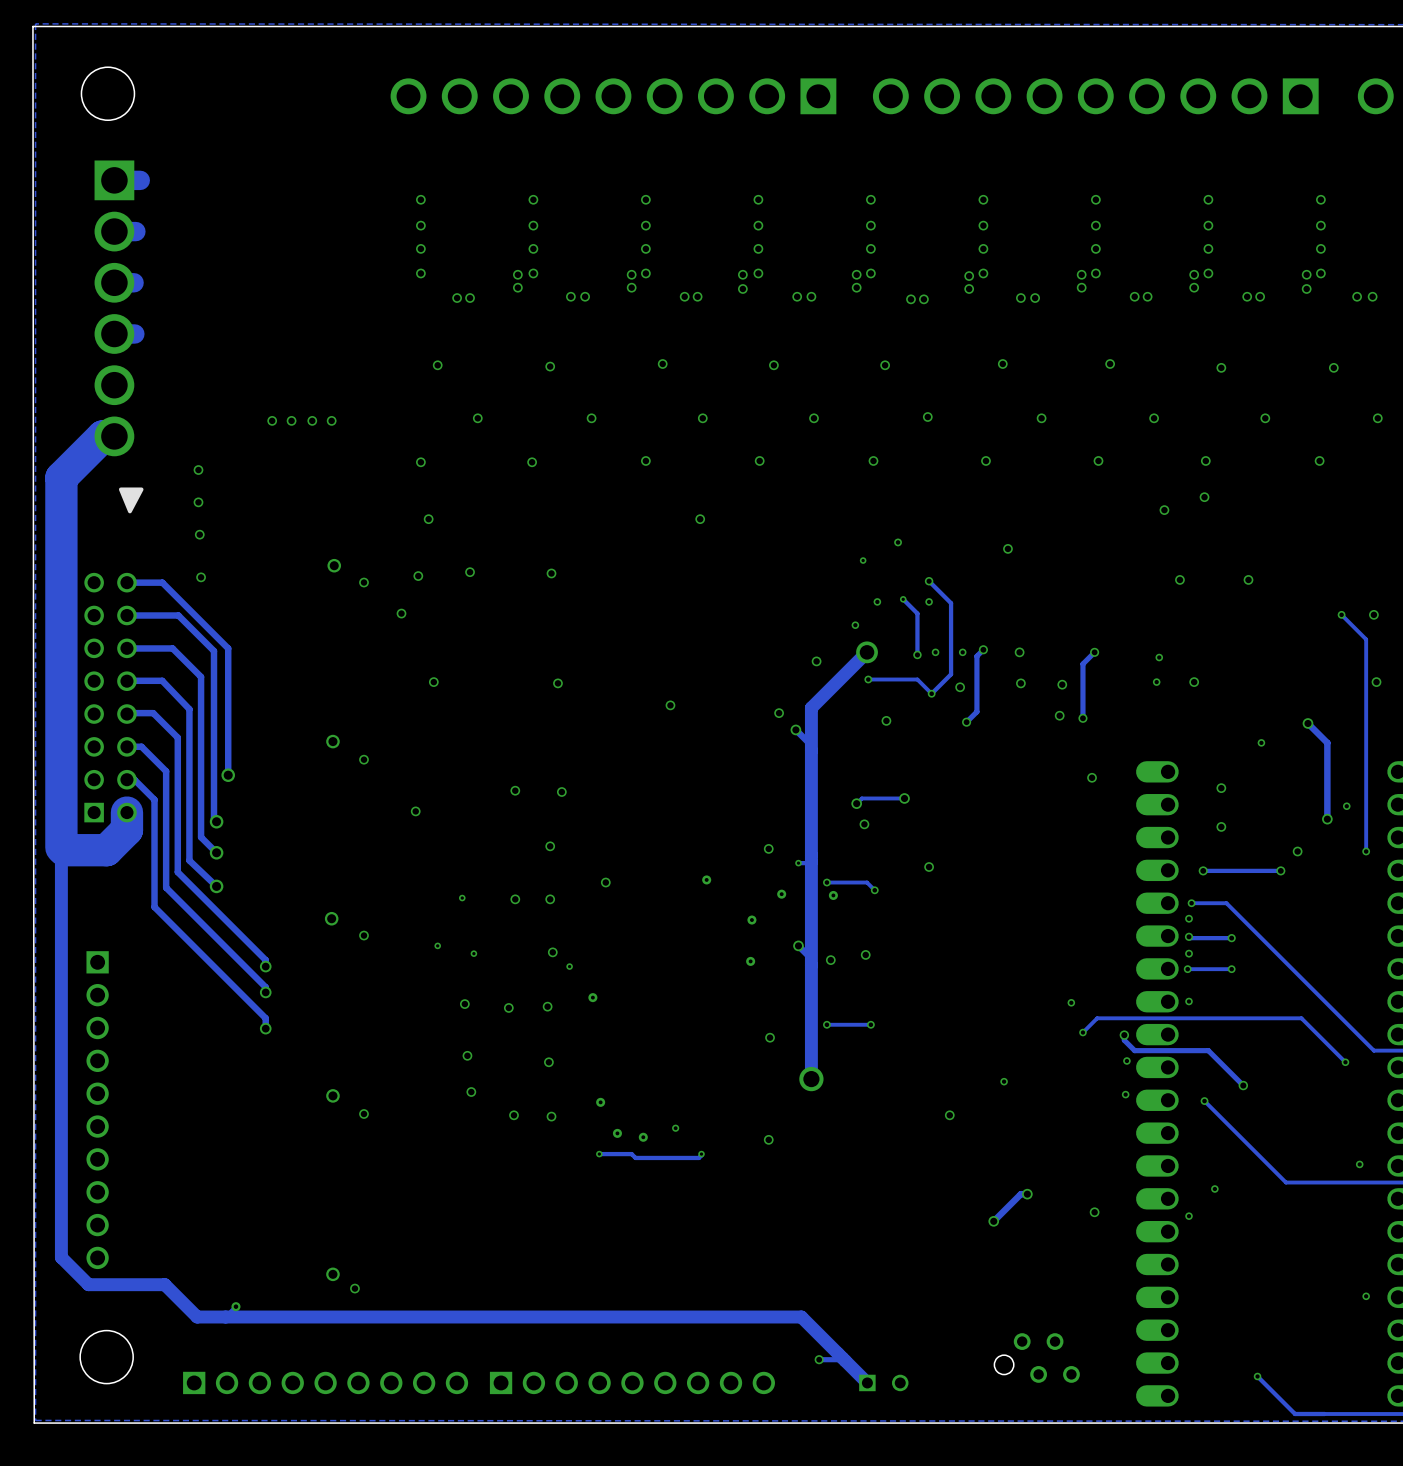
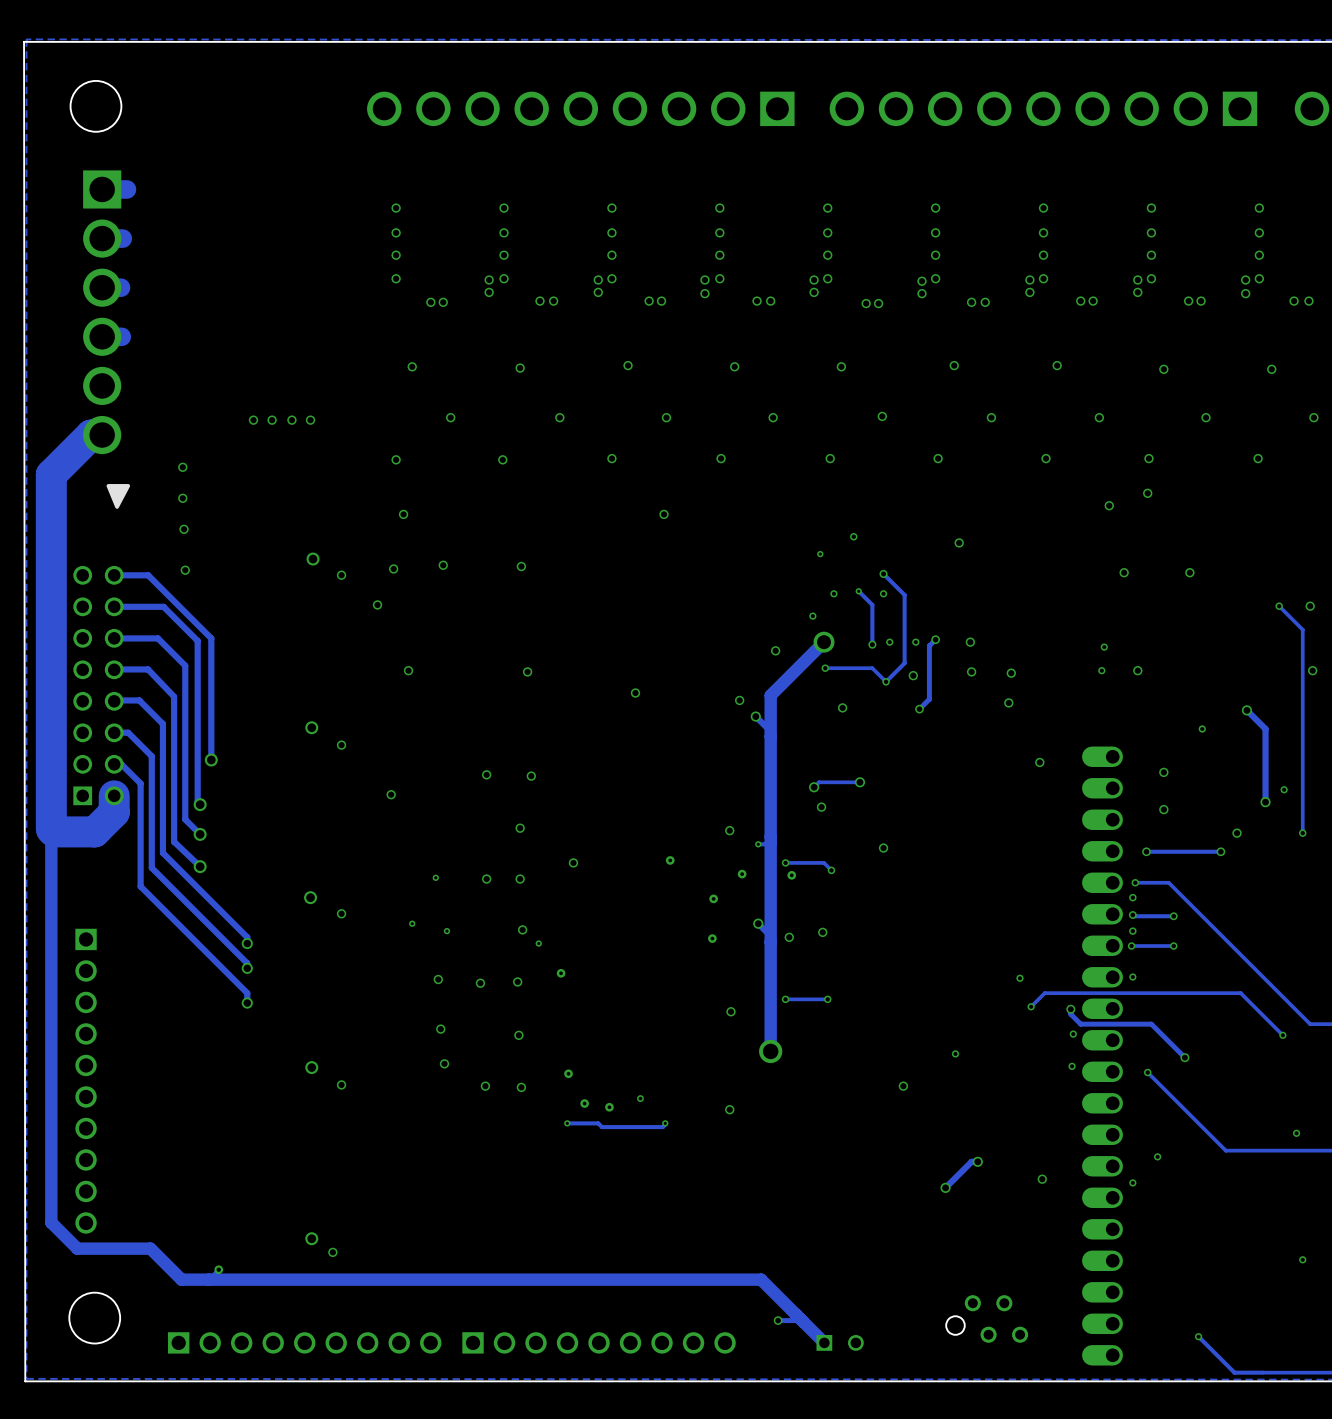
track: (1094, 652) (1082, 663) (1082, 718) -> none
via: (1094, 652) -> none
via: (1082, 718) -> none

